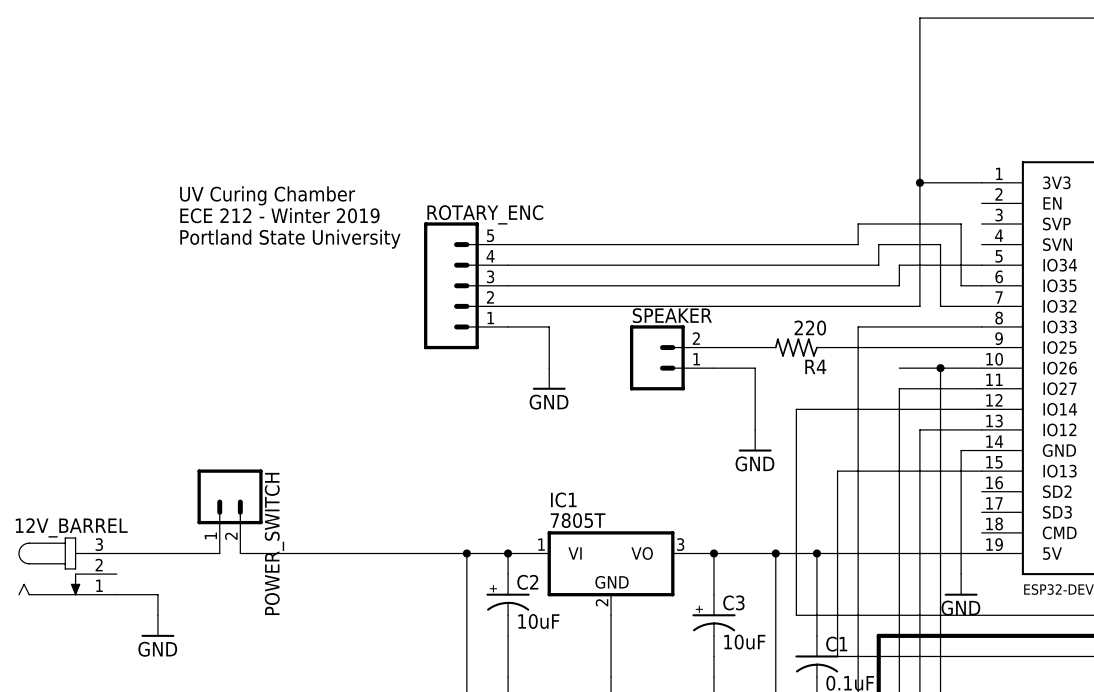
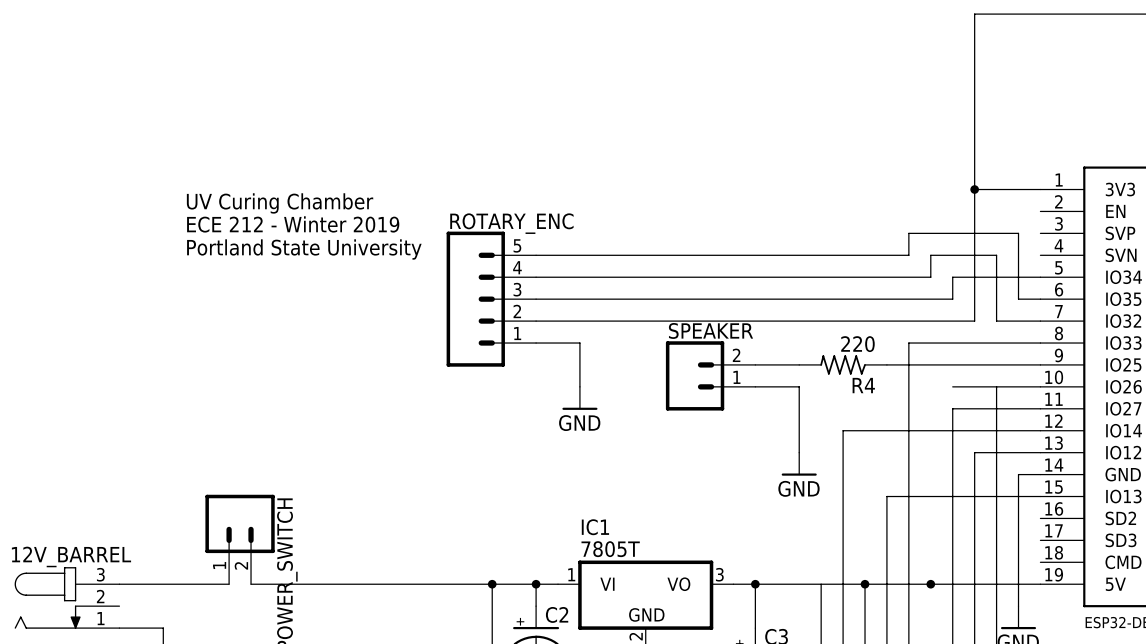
junction: (940, 368) -> none
junction: (775, 553) -> none
junction: none -> (930, 584)

